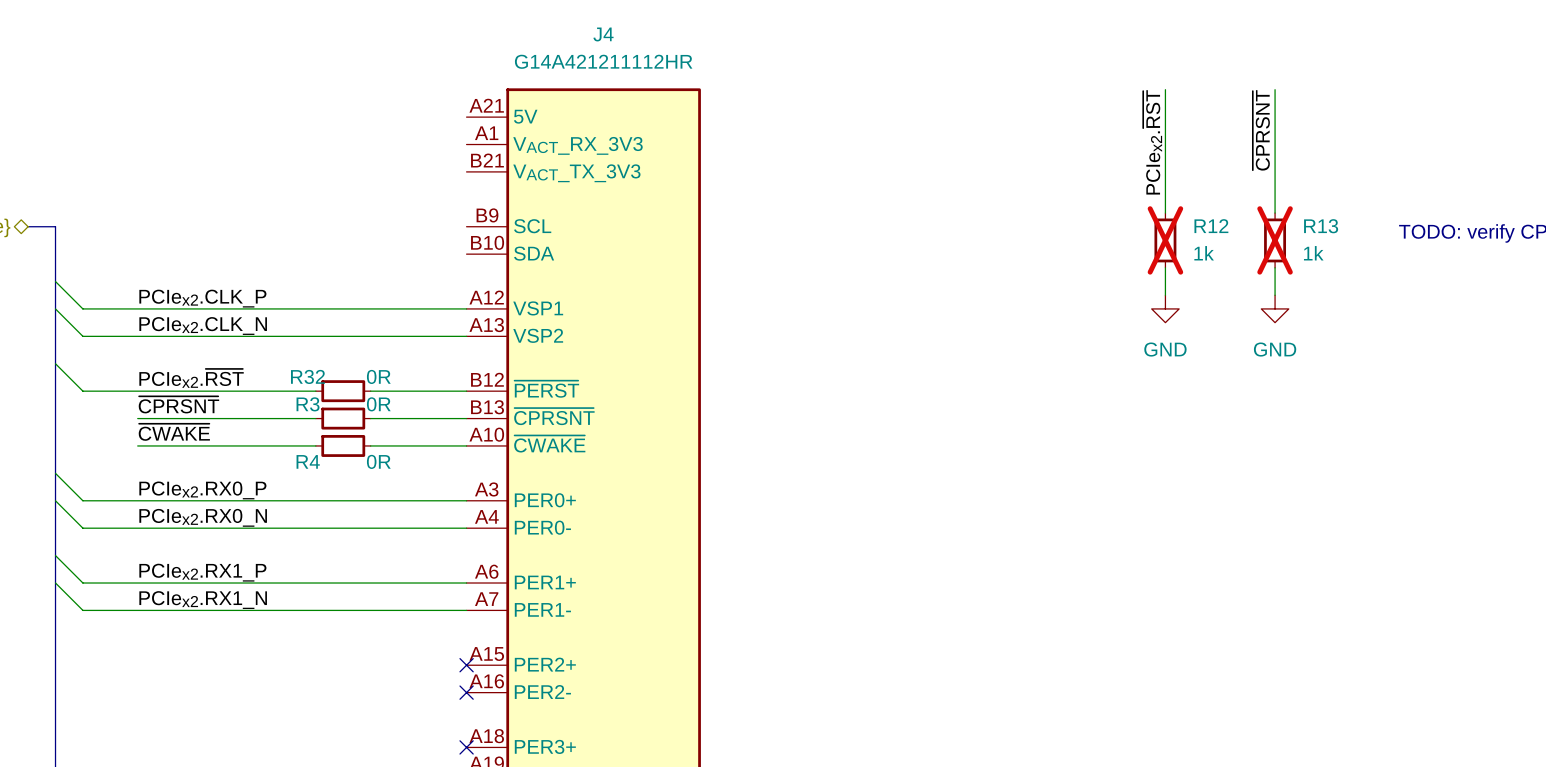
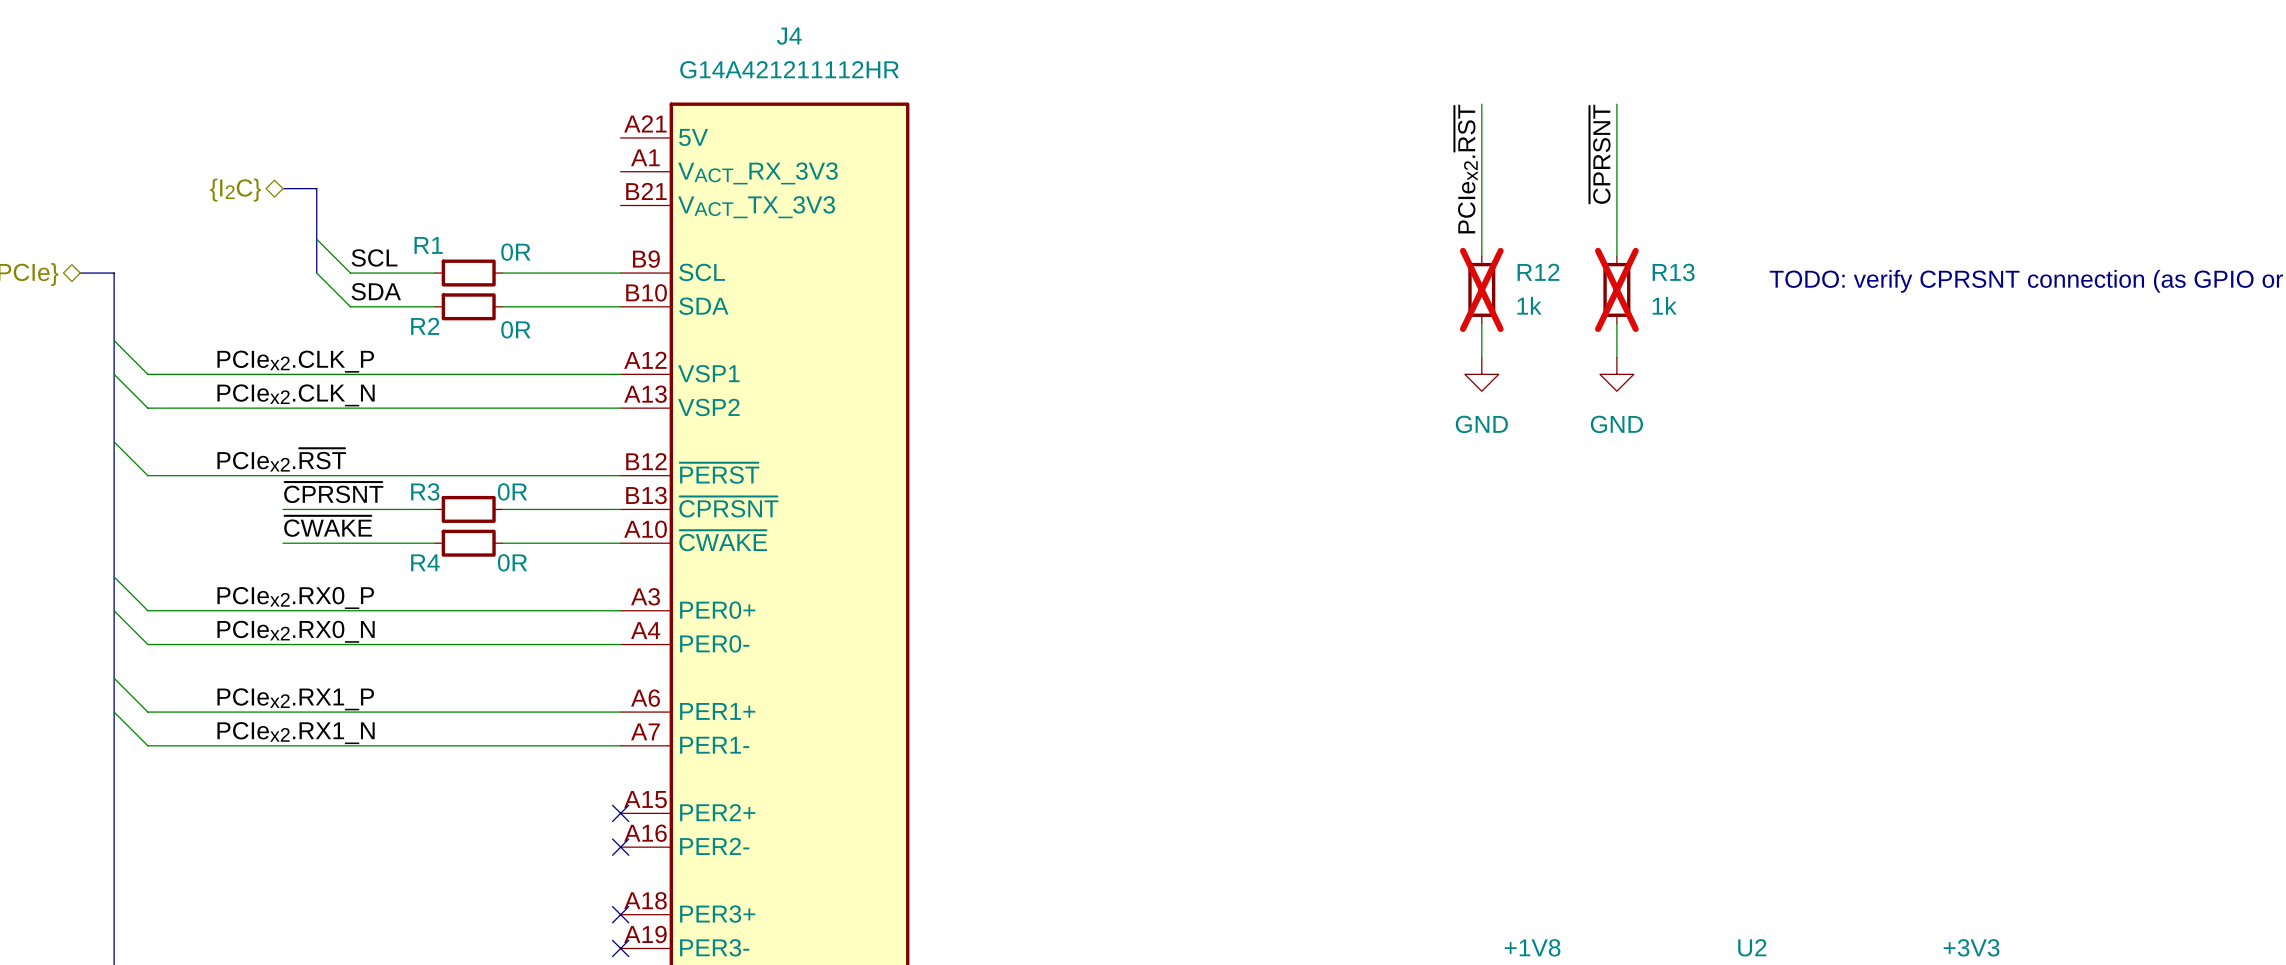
bus: none -> (282, 188) (316, 188) (316, 273)
hierarchical label: none -> {I2C} (235, 190)
wire: none -> (316, 239) (350, 273) (434, 273)
label: none -> SCL (374, 257)
wire: none -> (316, 273) (350, 306) (434, 306)
R1: none -> (468, 273)
wire: none -> (502, 273) (620, 273)
label: none -> SDA (376, 291)
R2: none -> (468, 306)
wire: none -> (502, 306) (620, 306)
R32: (343, 391) -> none
label position: ~{CPRSNT} (178, 404) -> ~{CPRSNT} (333, 492)
wire: (137, 418) (192, 418) -> (434, 475) (502, 475)
label position: ~{CWAKE} (174, 432) -> ~{CWAKE} (328, 526)
wire: (137, 445) (192, 445) -> none

